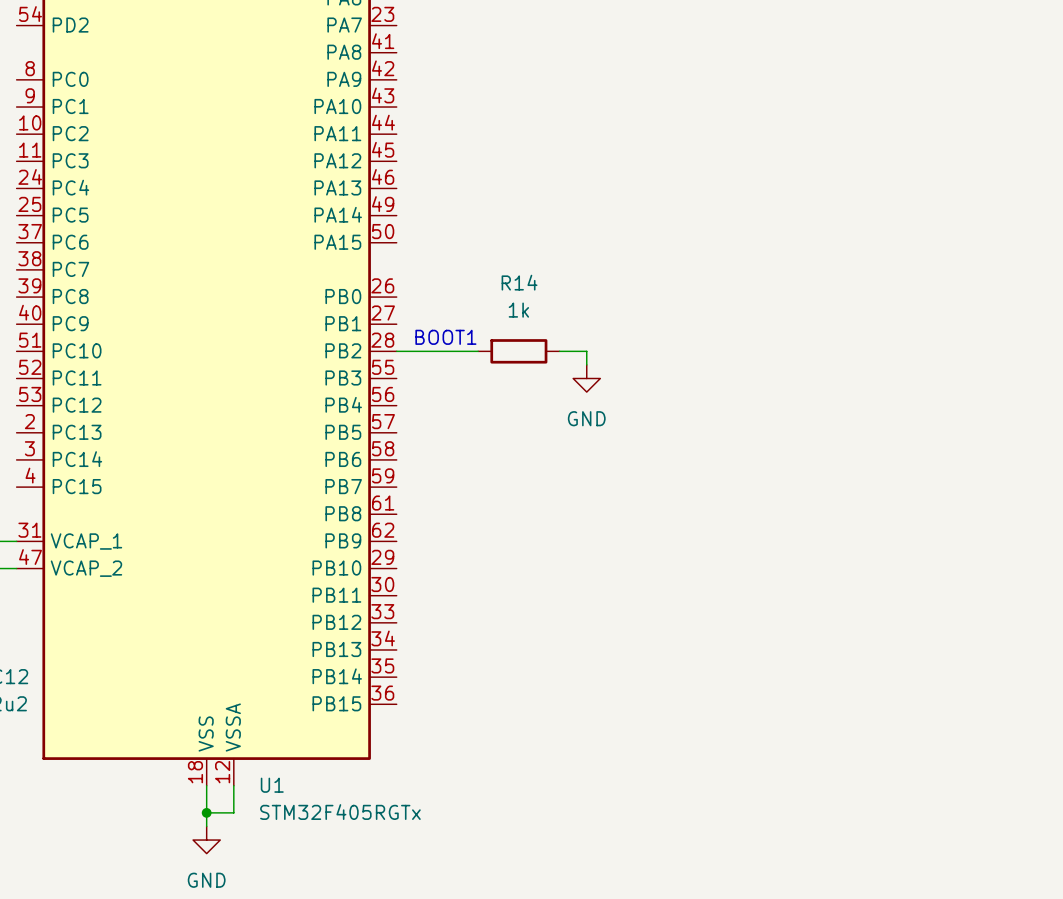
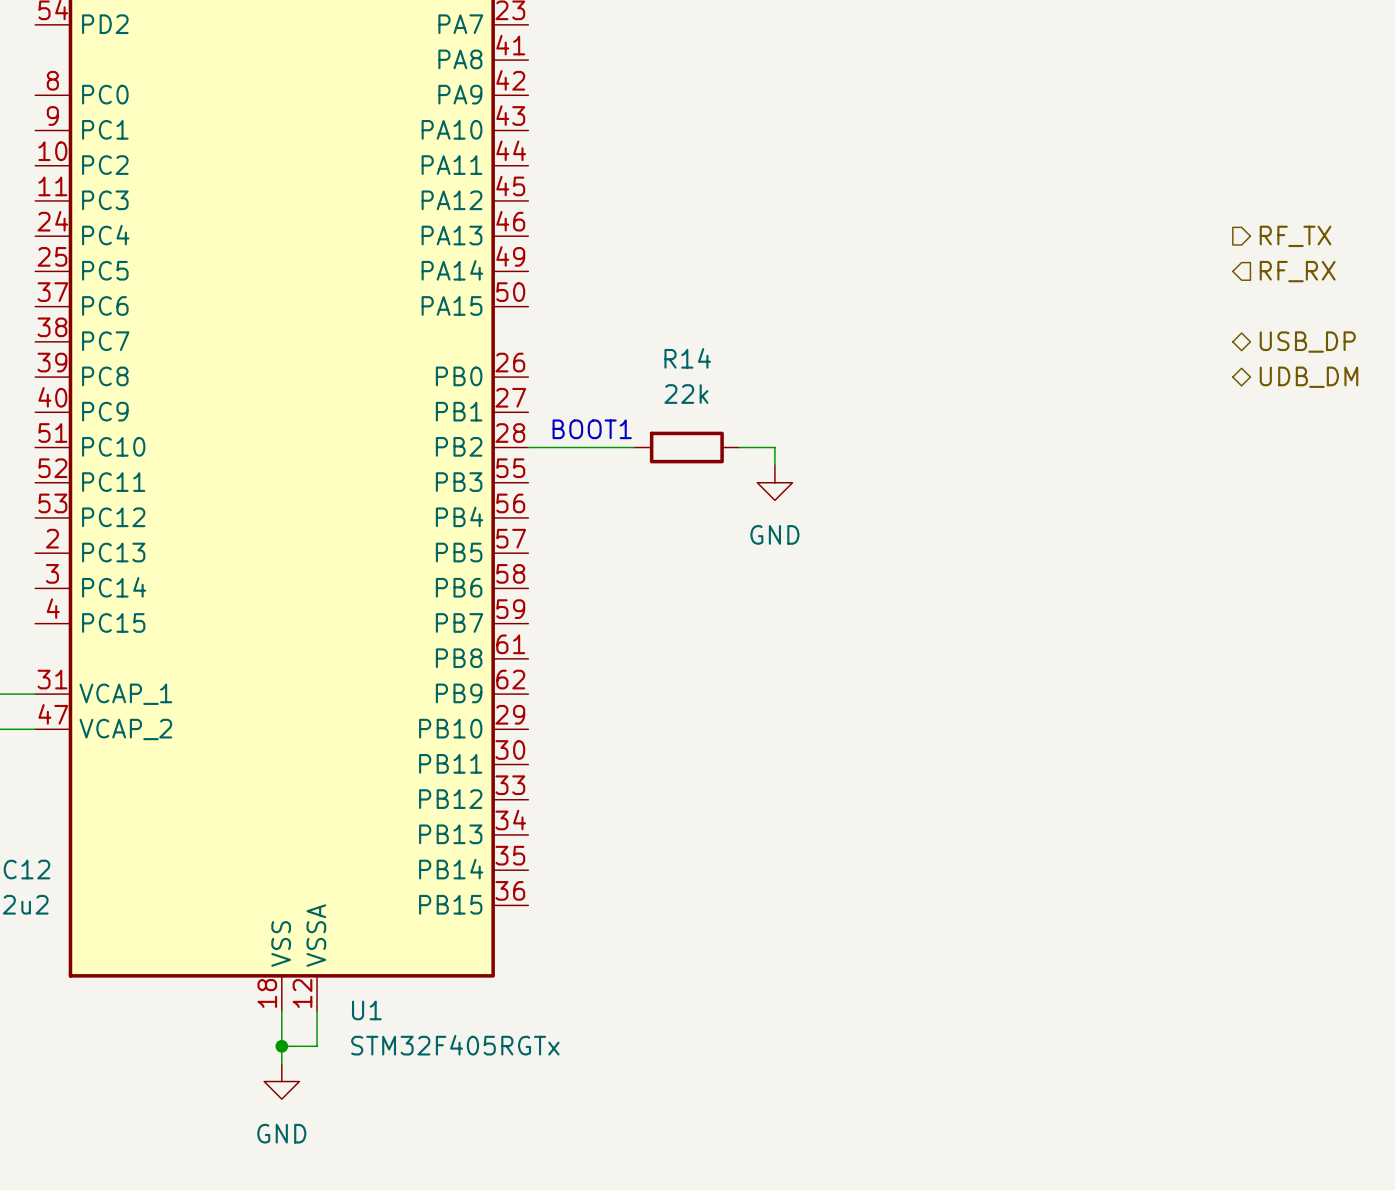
hierarchical label: none -> RF_TX (1295, 236)
hierarchical label: none -> RF_RX (1297, 271)
hierarchical label: none -> USB_DP (1307, 342)
hierarchical label: none -> UDB_DM (1308, 377)
R14 value: 1k (518, 310) -> 22k (686, 394)

